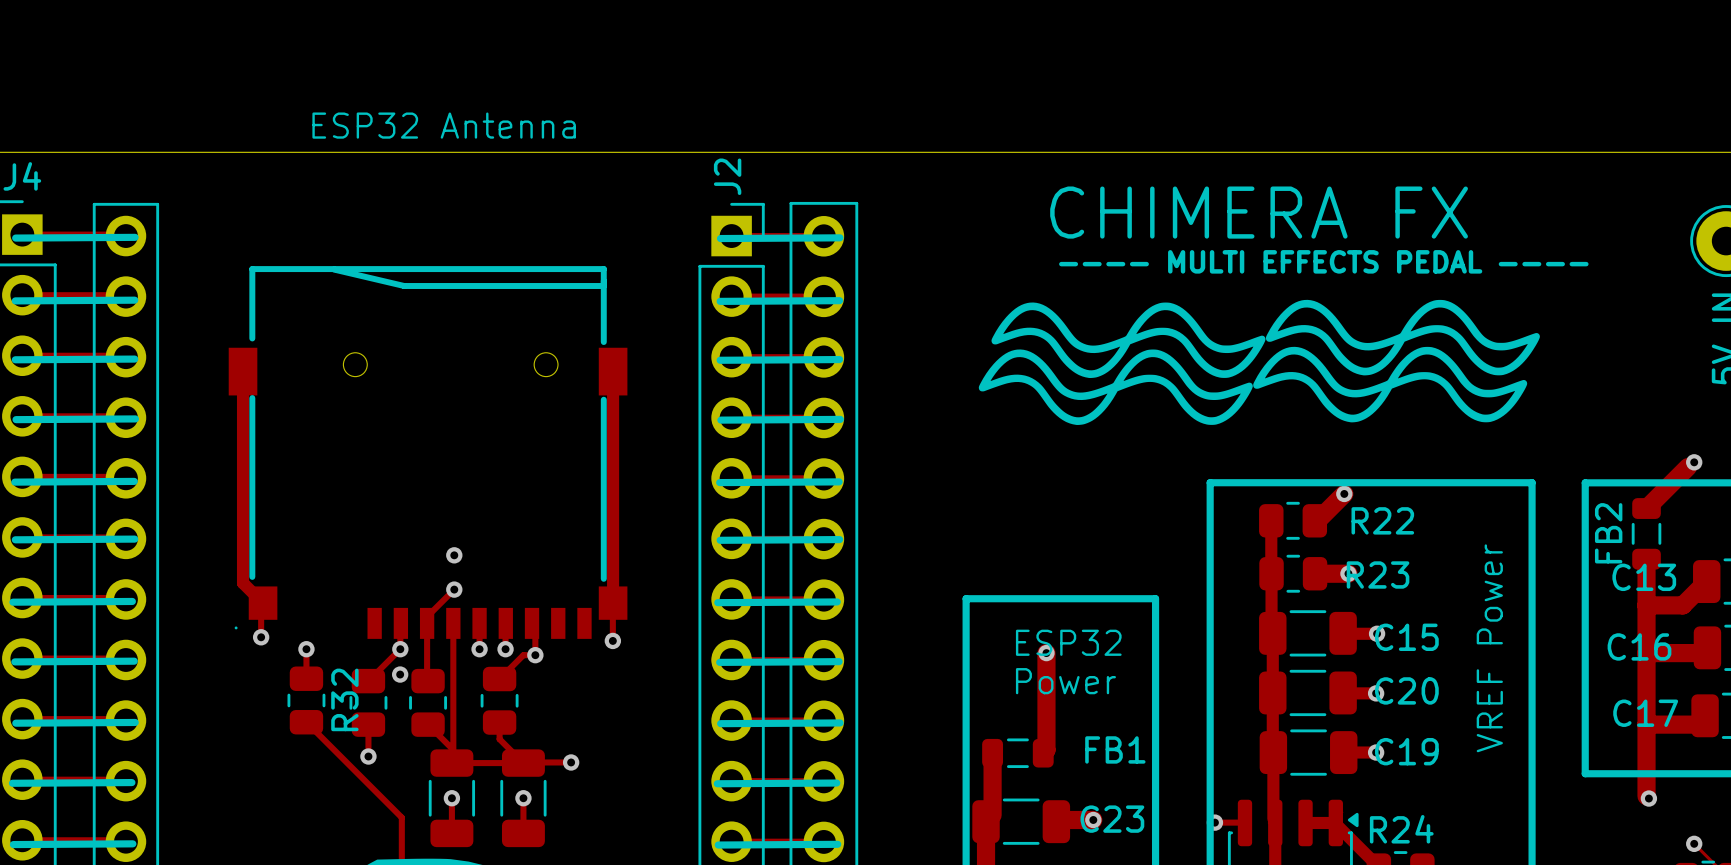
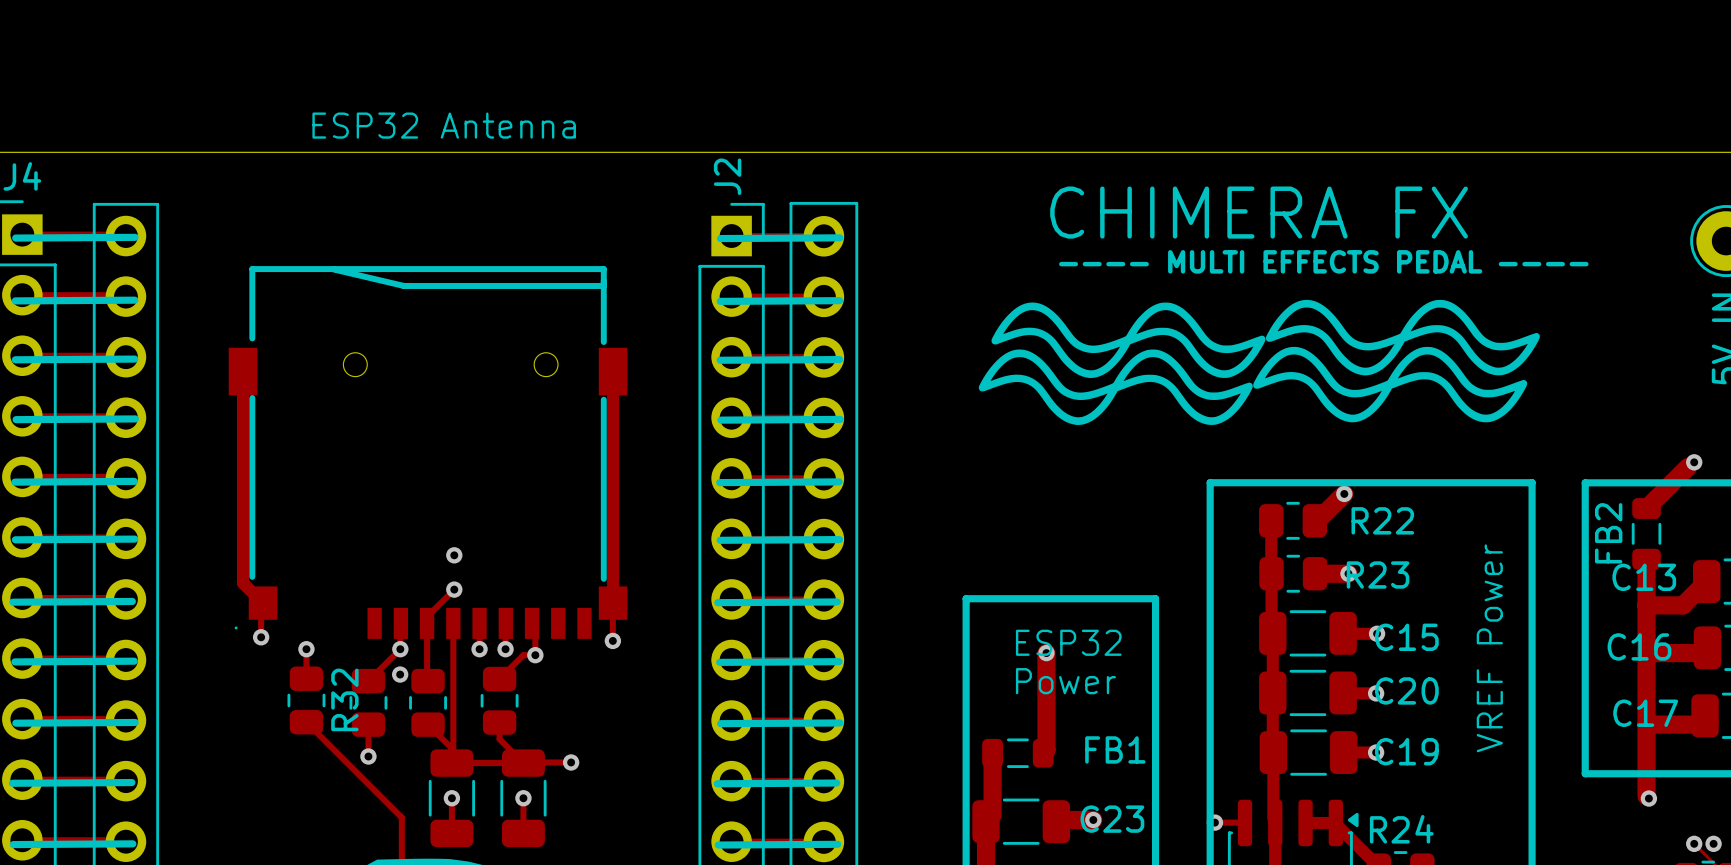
via: none -> (1713, 843)

